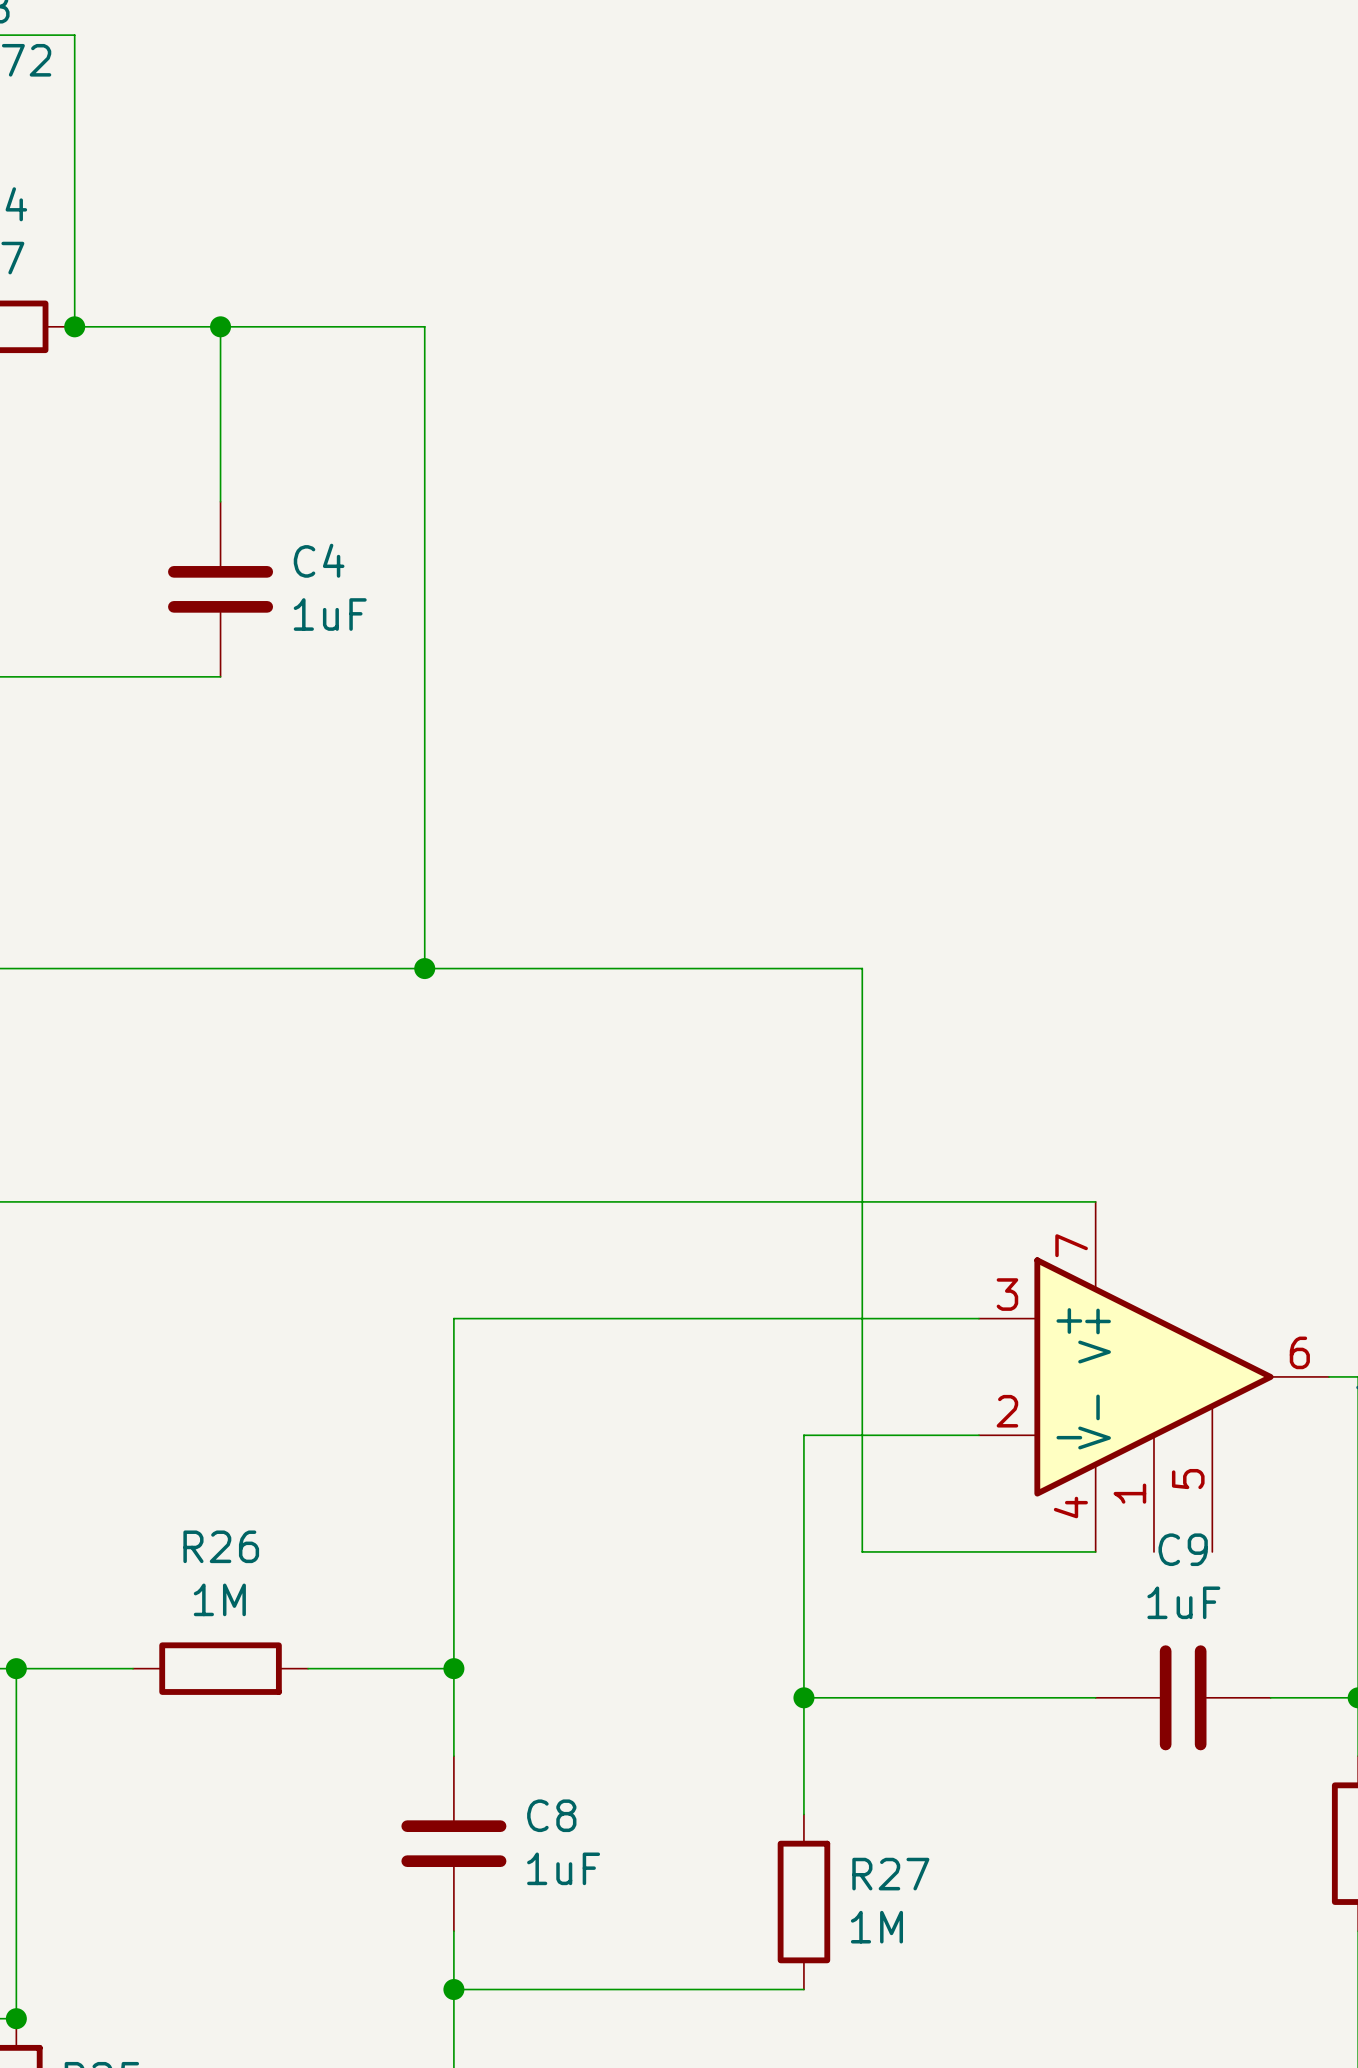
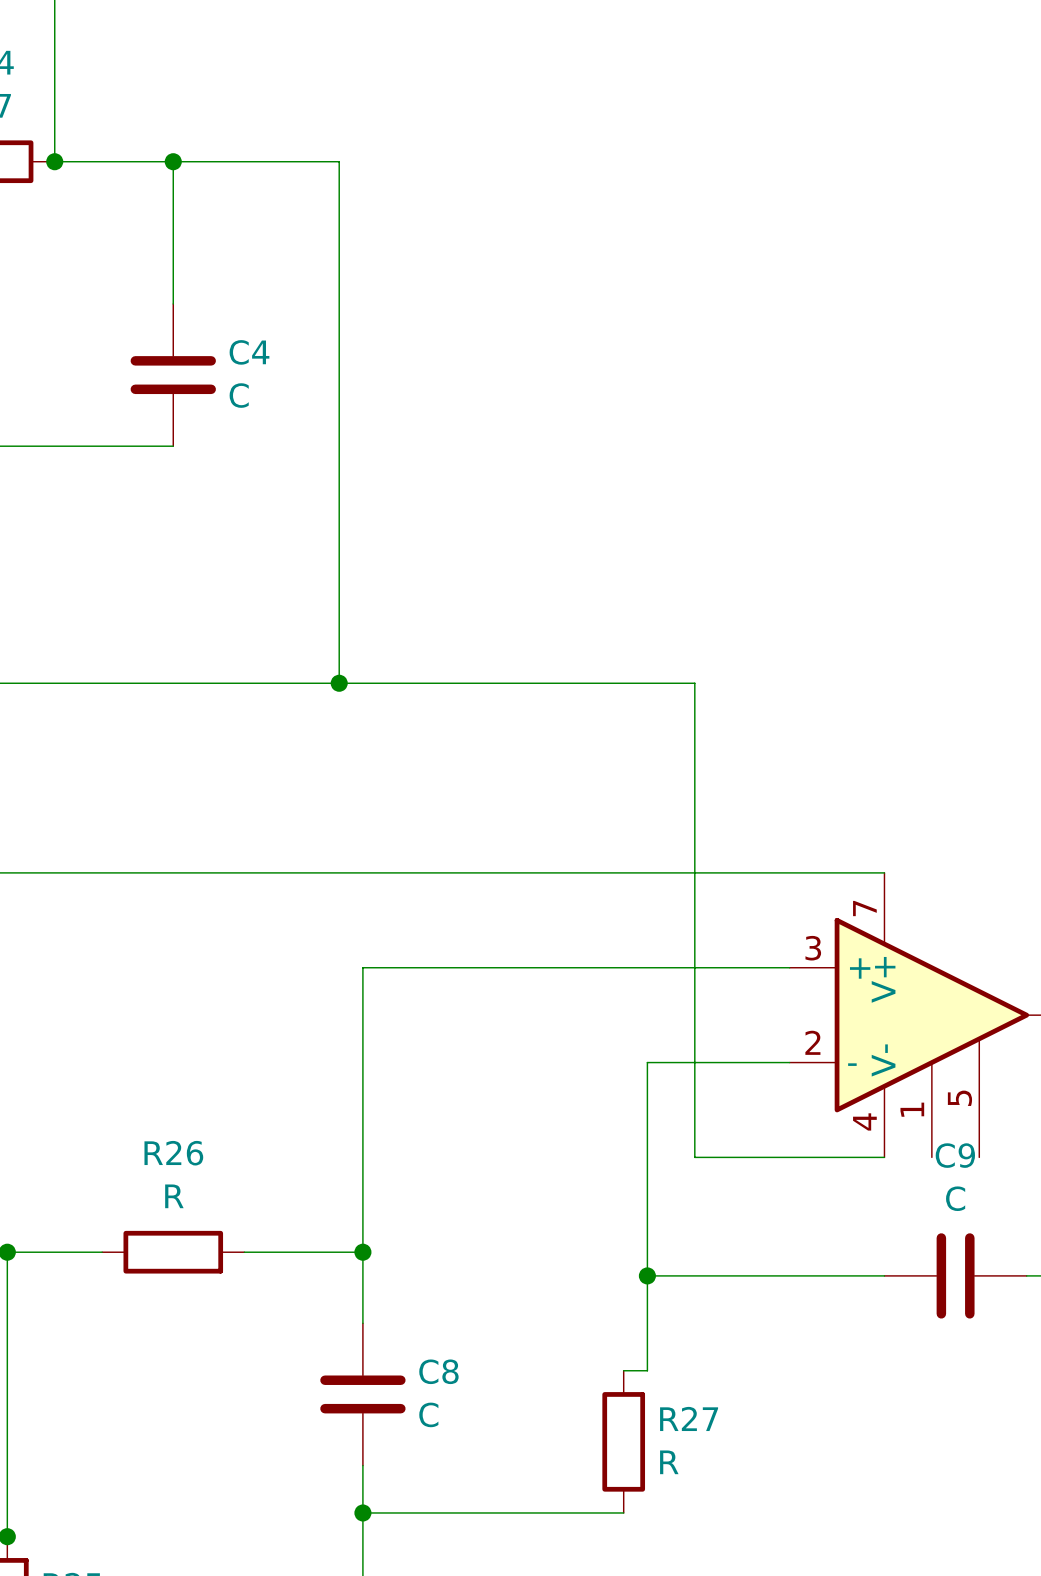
C4 value: 1uF (330, 614) -> C (239, 395)
R26 value: 1M (219, 1599) -> R (174, 1196)
C9 value: 1uF (1183, 1602) -> C (955, 1198)
C8 value: 1uF (563, 1868) -> C (428, 1414)
R27 position: (803, 1902) -> (623, 1441)
R27 value: 1M (876, 1927) -> R (669, 1462)
wire: (774, 1989) (803, 1989) -> (623, 1370) (647, 1370)

